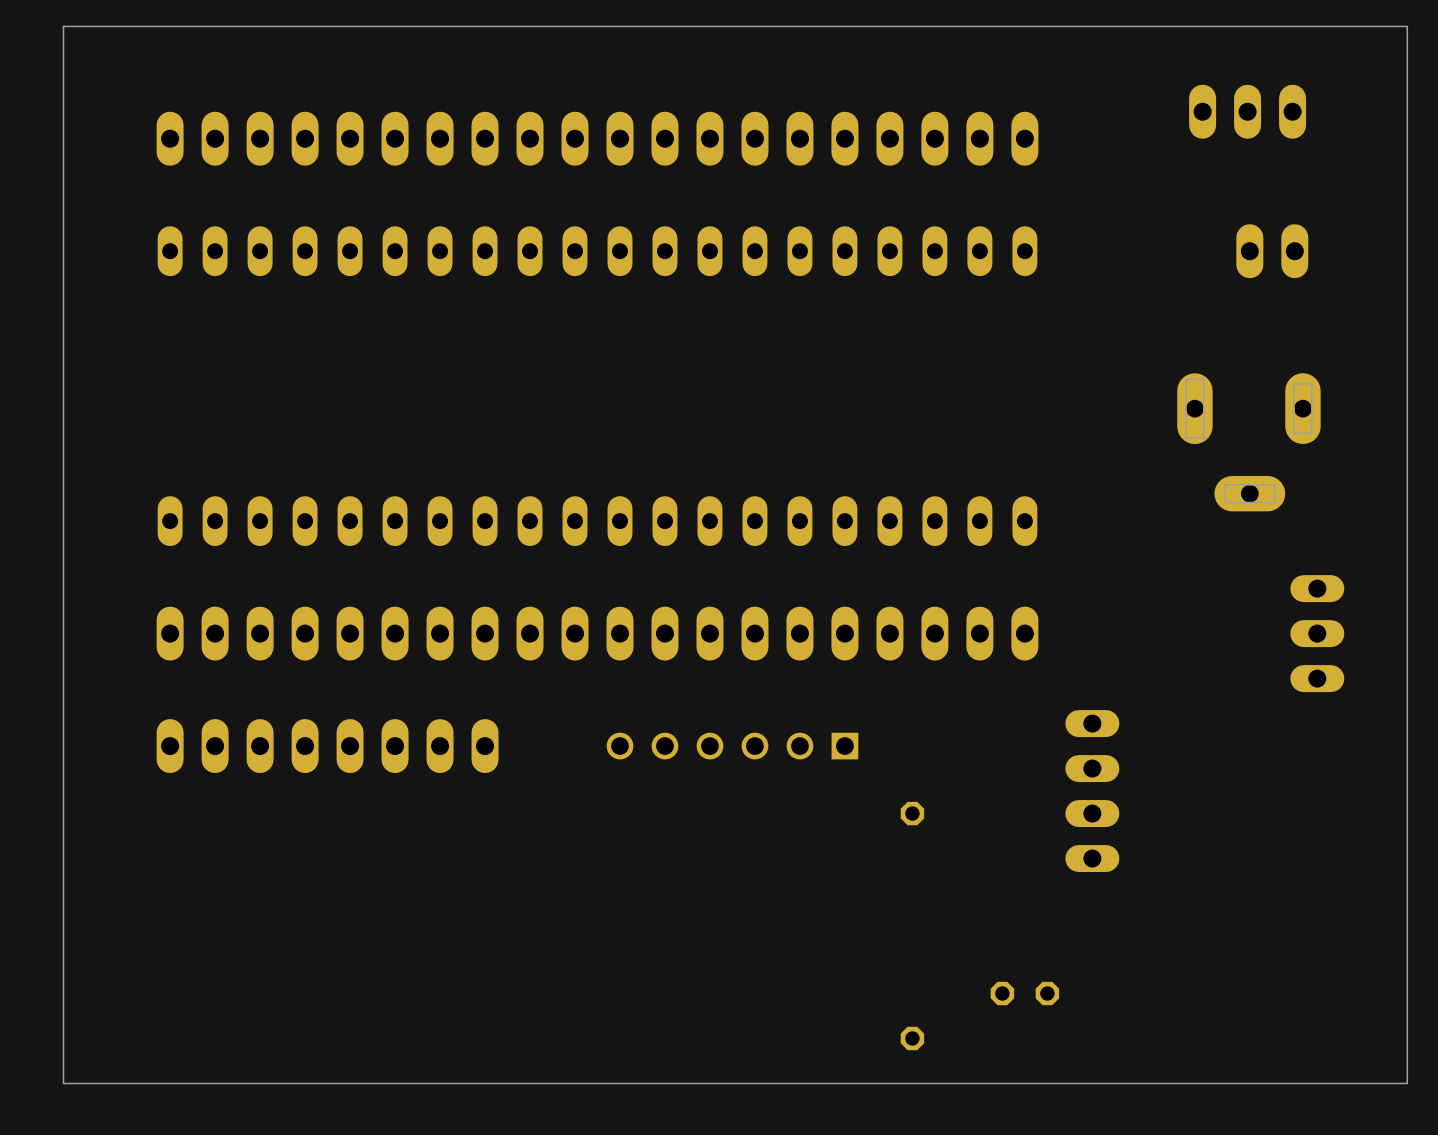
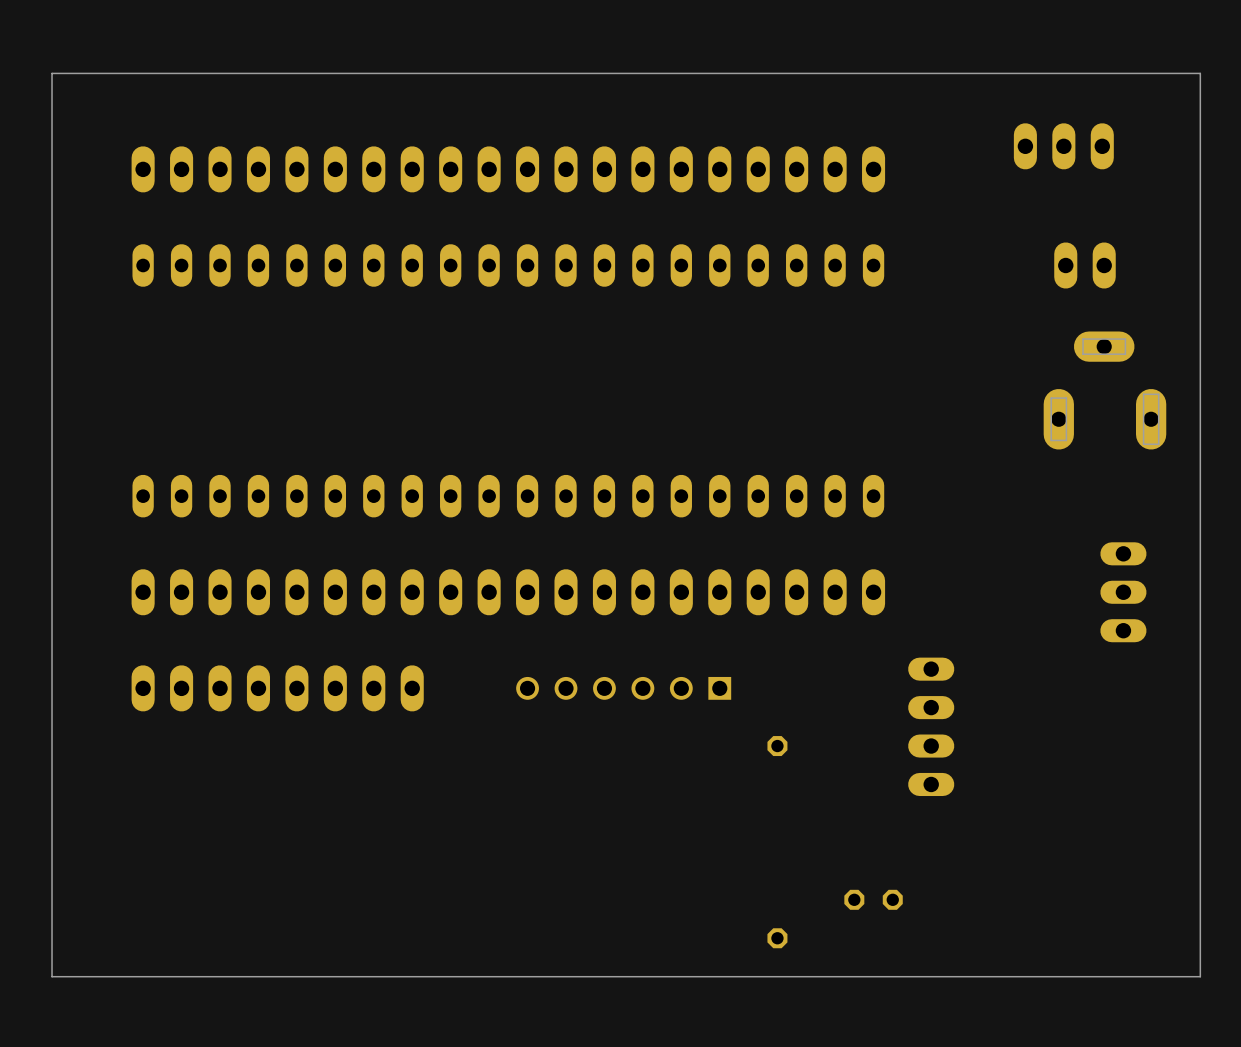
part rotation: 0° (1248, 442) -> 180° (1104, 390)

